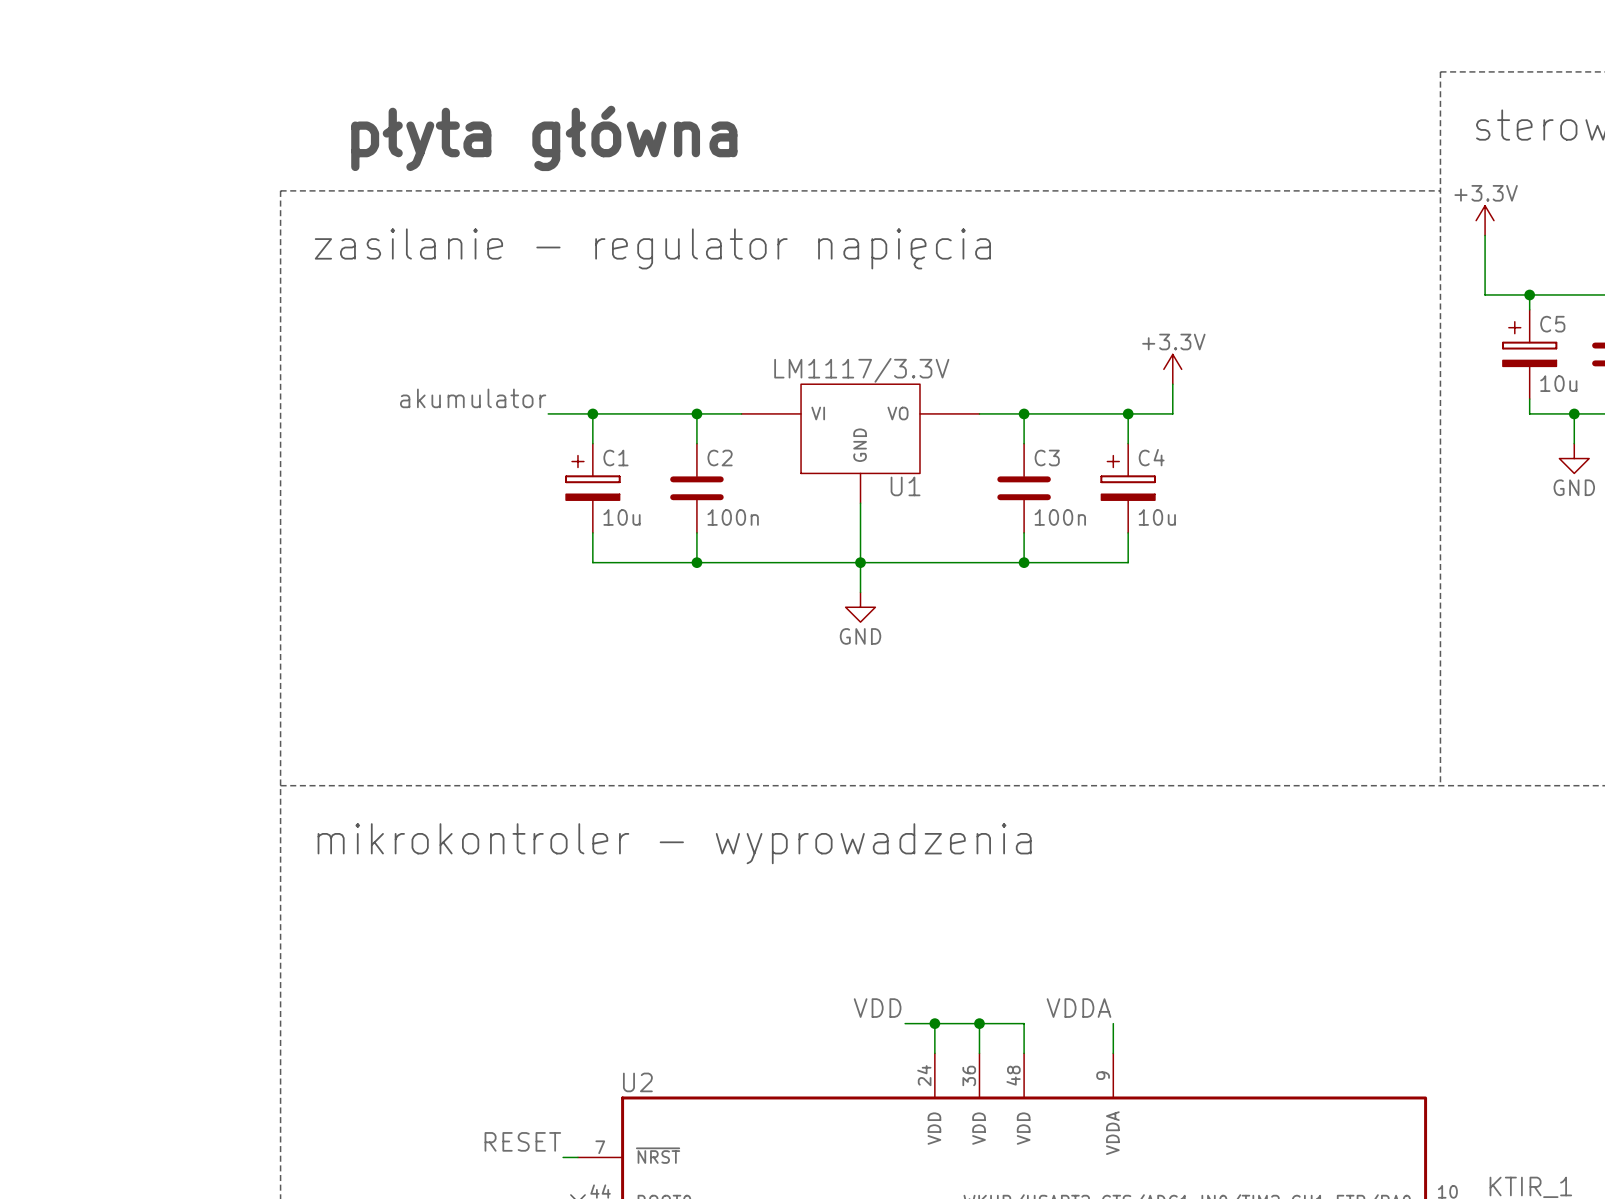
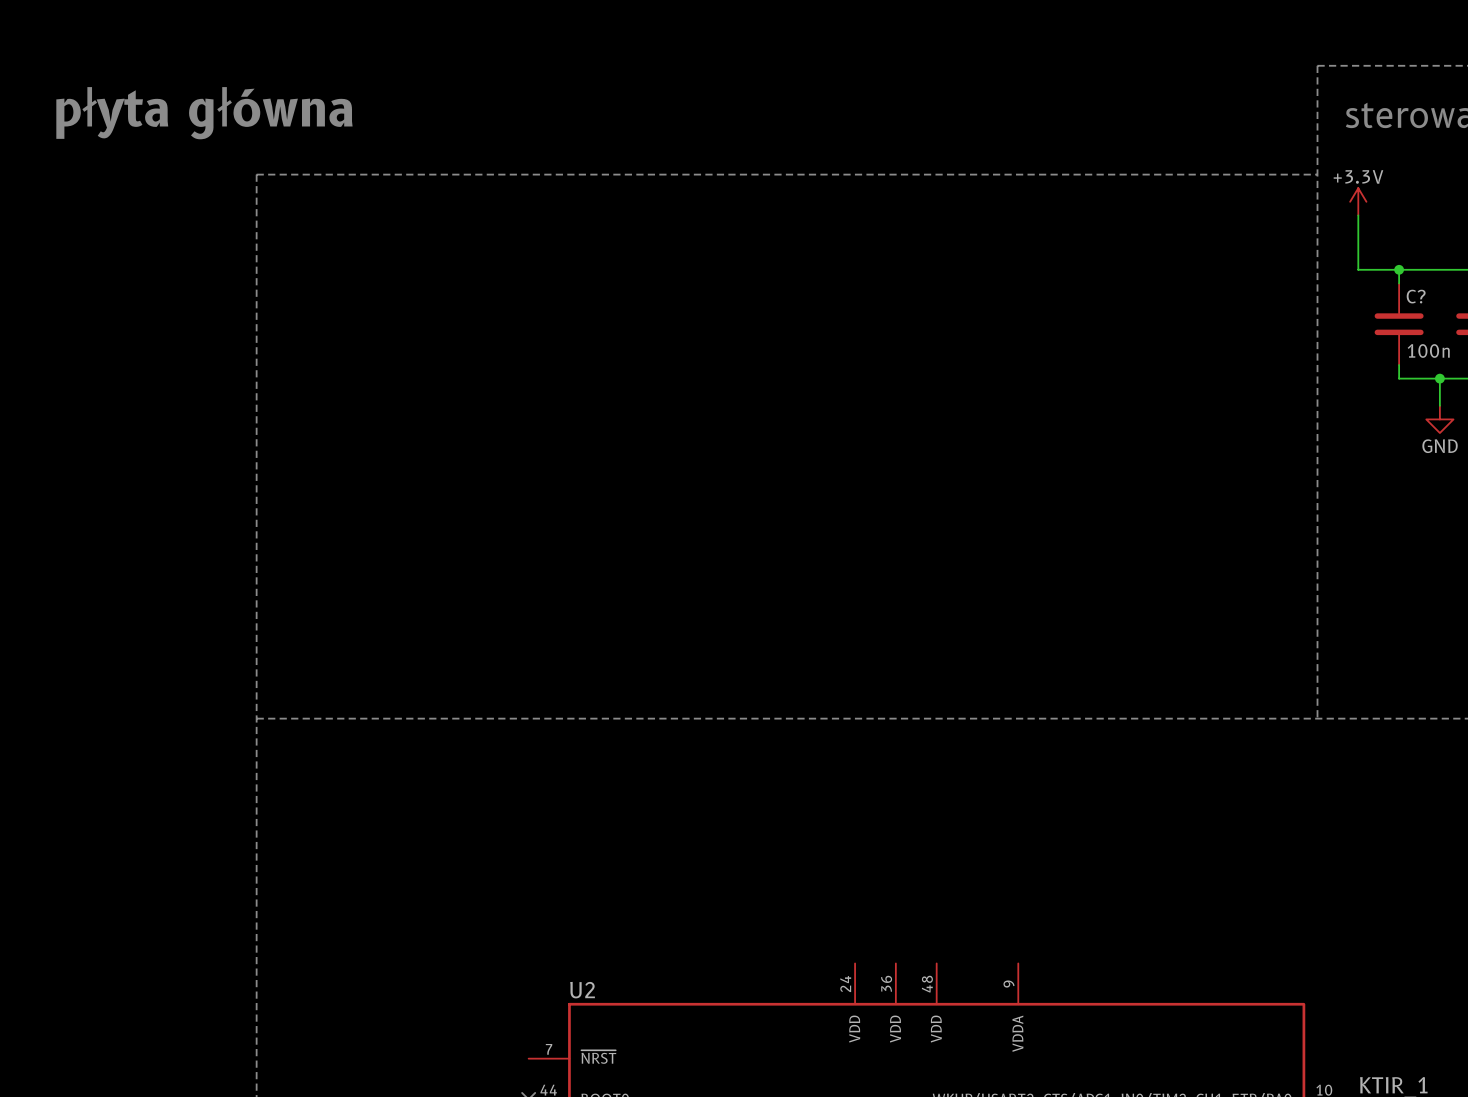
text position: płyta główna (544, 138) -> płyta główna (204, 113)
text: zasilanie - regulator napięcia (652, 248) -> none
C5: 10u (1529, 354) -> none
C?: none -> 100n (1399, 324)
power symbol: +3.3V (1172, 369) -> none
wire: (1172, 384) (1172, 413) (979, 413) -> none
label: akumulator (473, 398) -> none
wire: (548, 413) (741, 413) -> none
wire: (592, 413) (592, 443) -> none
junction: (592, 413) -> none
wire: (696, 413) (696, 443) -> none
junction: (696, 413) -> none
wire: (1024, 413) (1024, 443) -> none
junction: (1024, 413) -> none
wire: (1128, 413) (1128, 443) -> none
junction: (1128, 413) -> none
U1: LM1117/3.3V (860, 443) -> none
C1: 10u (592, 488) -> none
C2: 100n (696, 488) -> none
C3: 100n (1024, 488) -> none
C4: 10u (1128, 488) -> none
wire: (860, 503) (860, 592) -> none
wire: (592, 532) (592, 562) (1128, 562) (1128, 532) -> none
wire: (696, 532) (696, 562) -> none
wire: (1024, 532) (1024, 562) -> none
junction: (696, 562) -> none
junction: (860, 562) -> none
junction: (1024, 562) -> none
power symbol: GND (860, 607) -> none
text: mikrokontroler - wyprowadzenia (674, 843) -> none
label: VDD (877, 1008) -> none
label: VDDA (1078, 1008) -> none
wire: (905, 1023) (1024, 1023) (1024, 1053) -> none
wire: (934, 1023) (934, 1053) -> none
junction: (934, 1023) -> none
wire: (979, 1023) (979, 1053) -> none
junction: (979, 1023) -> none
wire: (1113, 1023) (1113, 1053) -> none
label: RESET (522, 1141) -> none
wire: (563, 1157) (577, 1157) -> none

